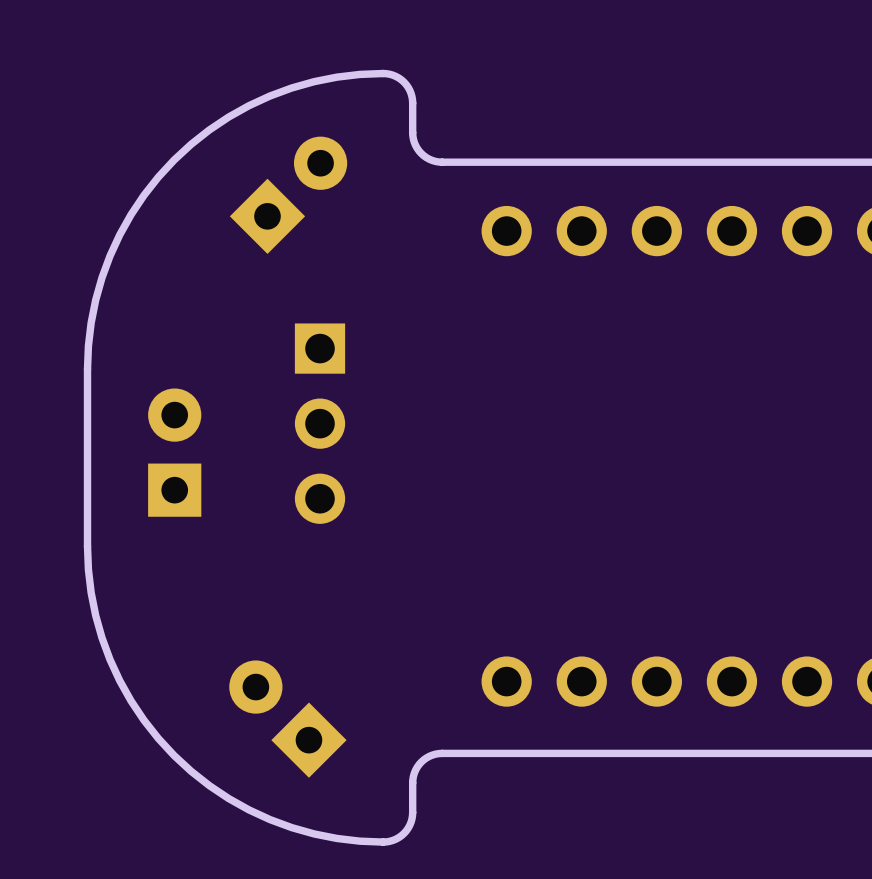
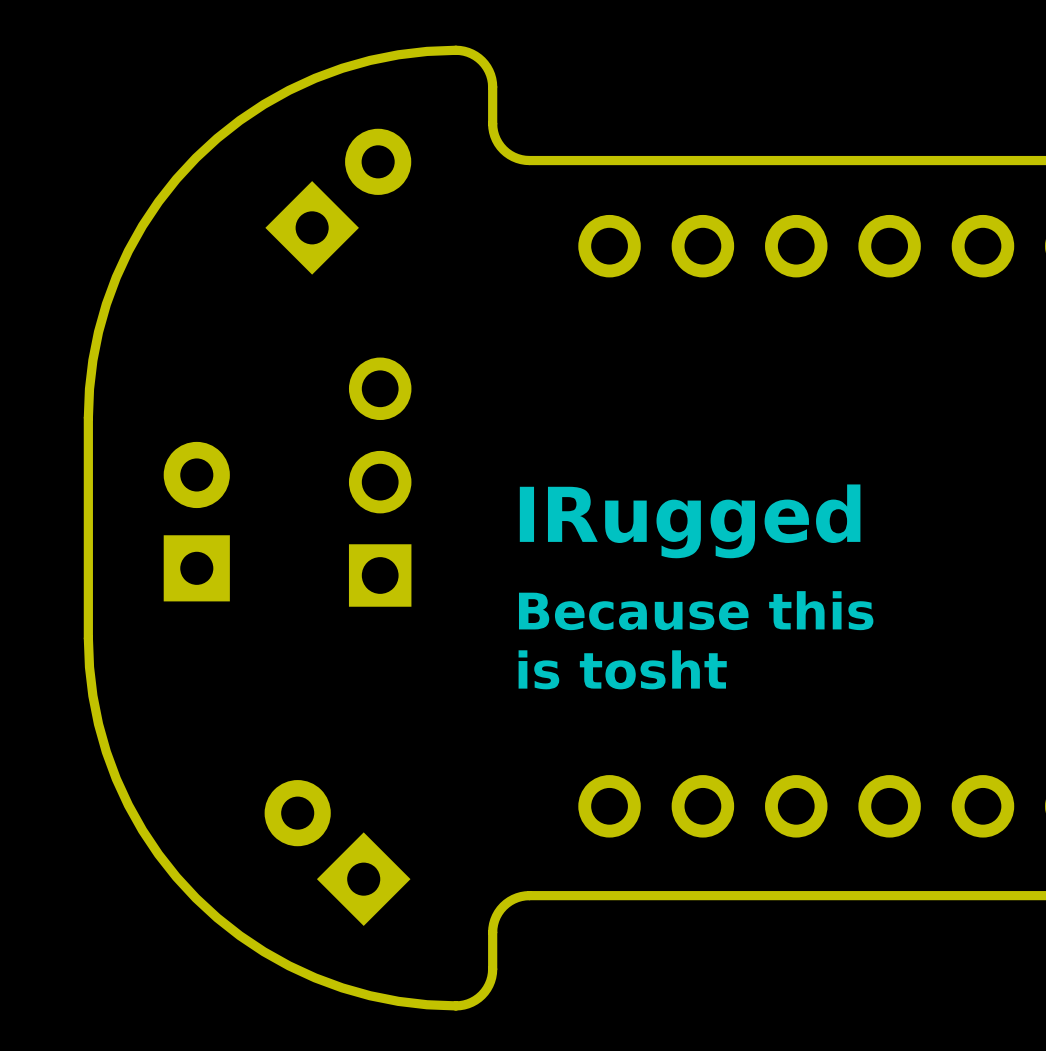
part rotation: 0° (320, 423) -> 180° (380, 482)
text: none -> IRugged (690, 521)
text: none -> Because this (696, 610)
text: none -> is tosht (622, 669)

